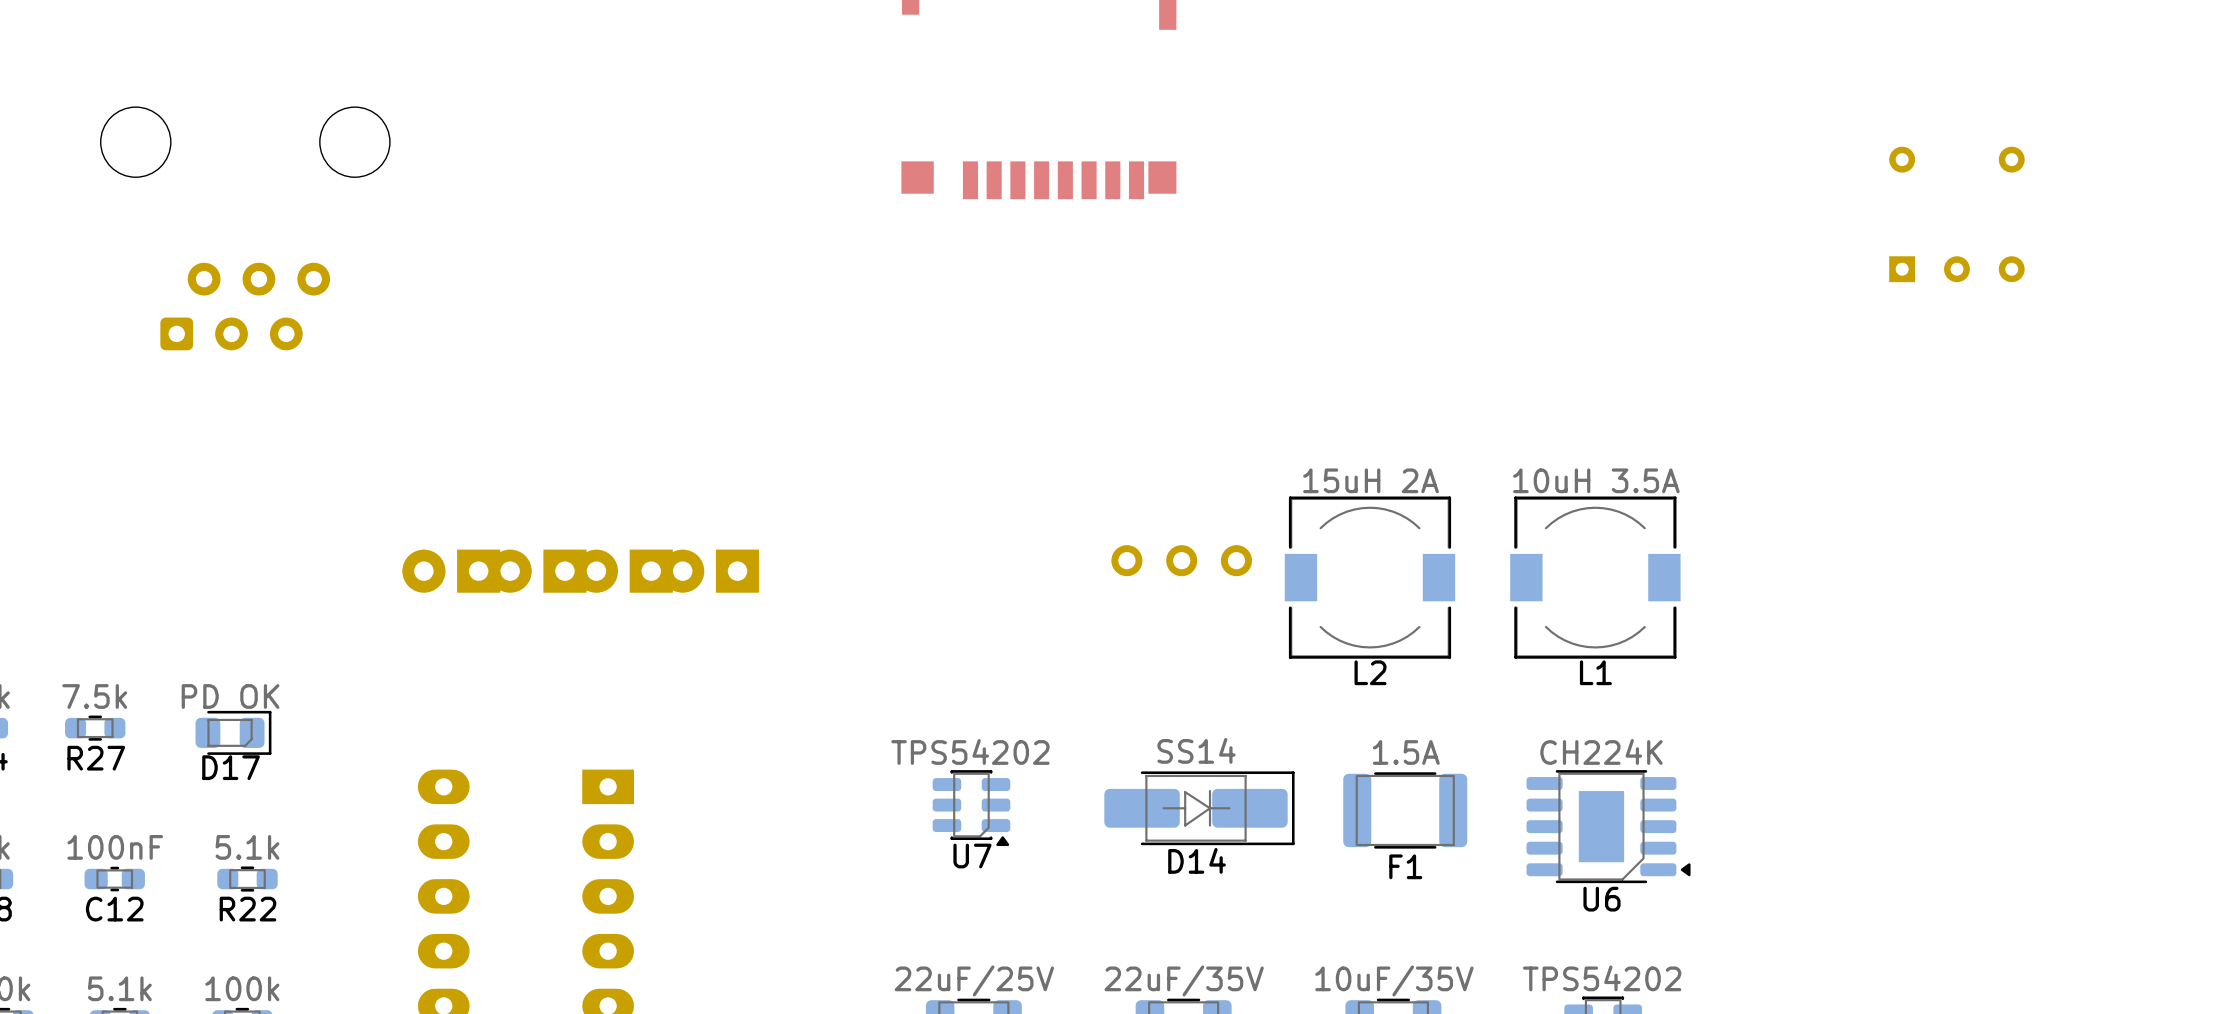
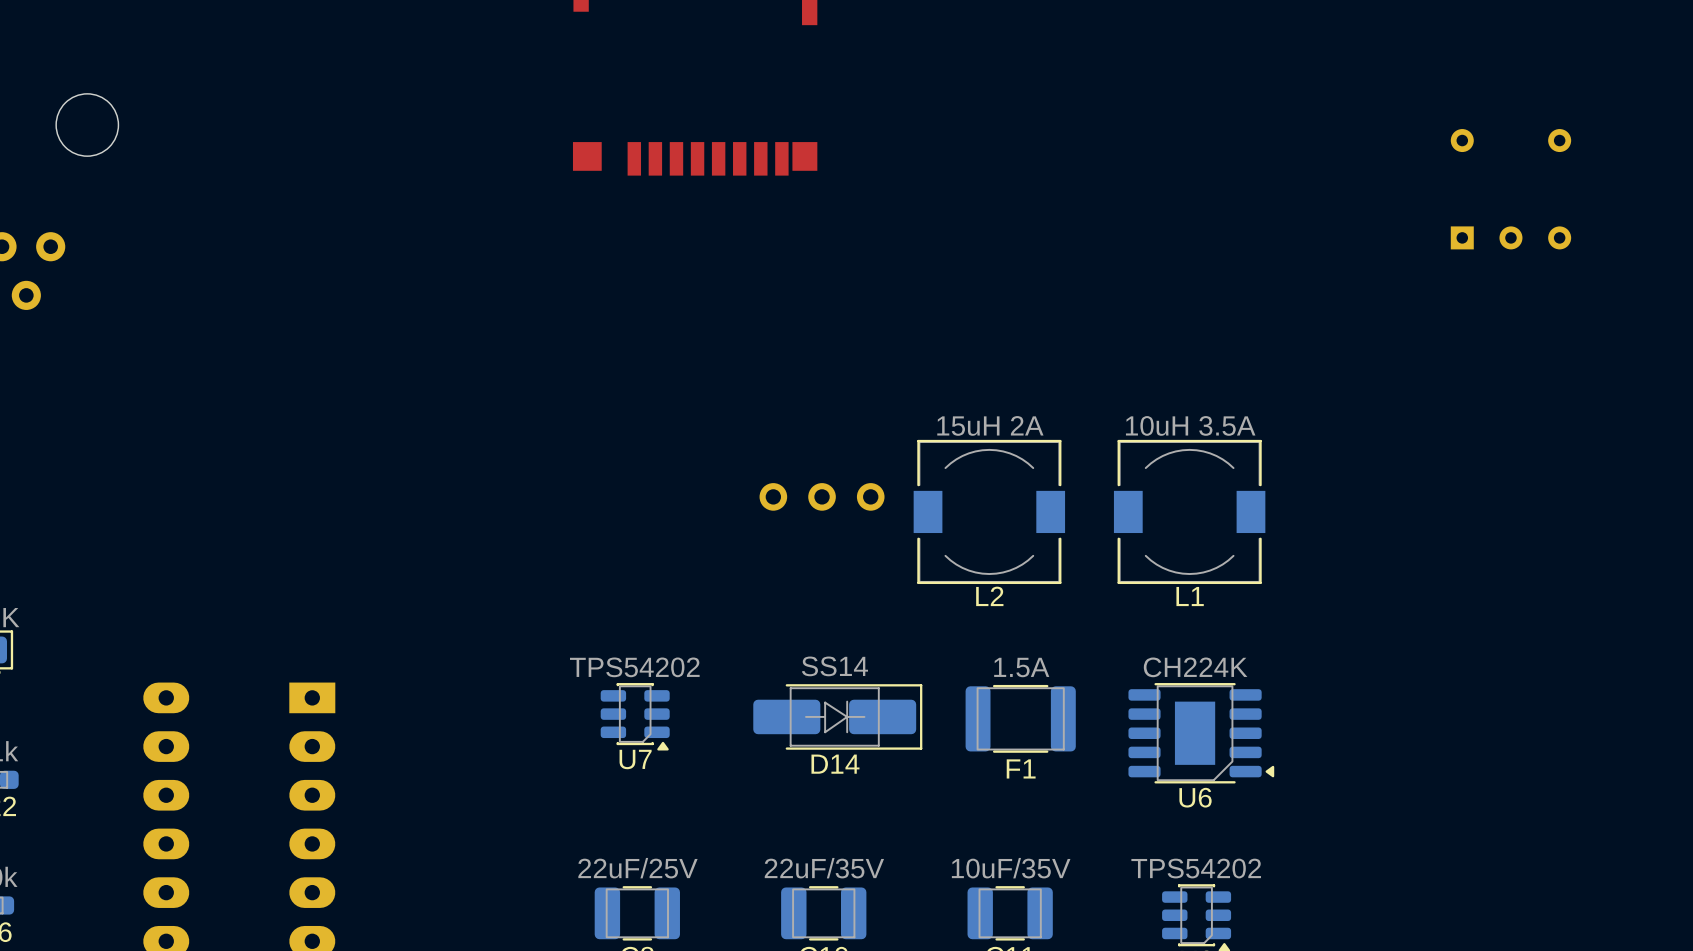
part: (451, 571) -> none
part: (537, 571) -> none
part: (623, 571) -> none
part: (710, 571) -> none

